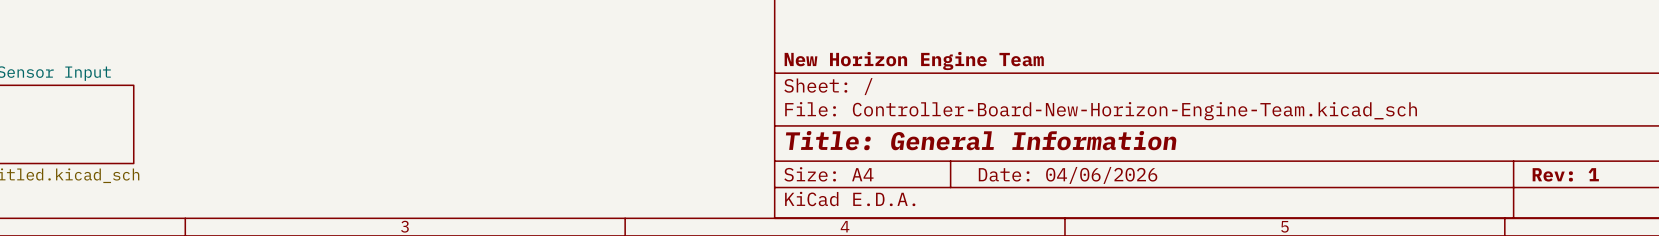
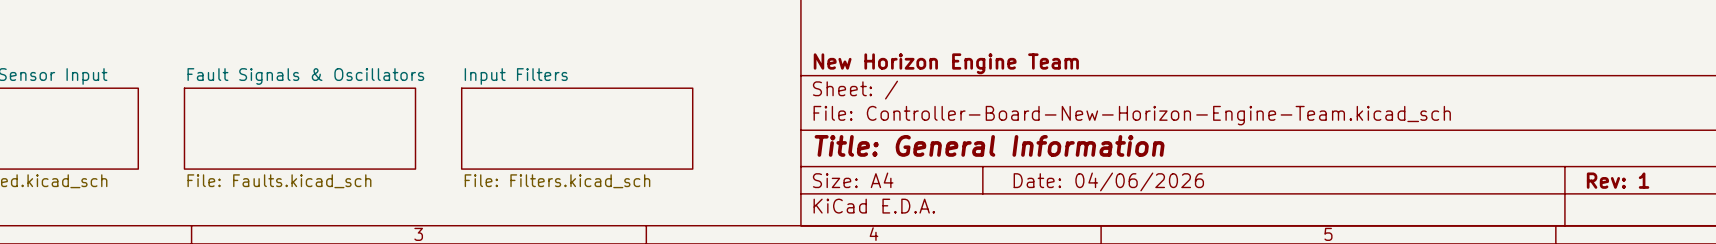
sheet Fault Signals & Oscillators: none -> File: Faults.kicad_sch (299, 128)
sheet Input Filters: none -> File: Filters.kicad_sch (577, 128)

